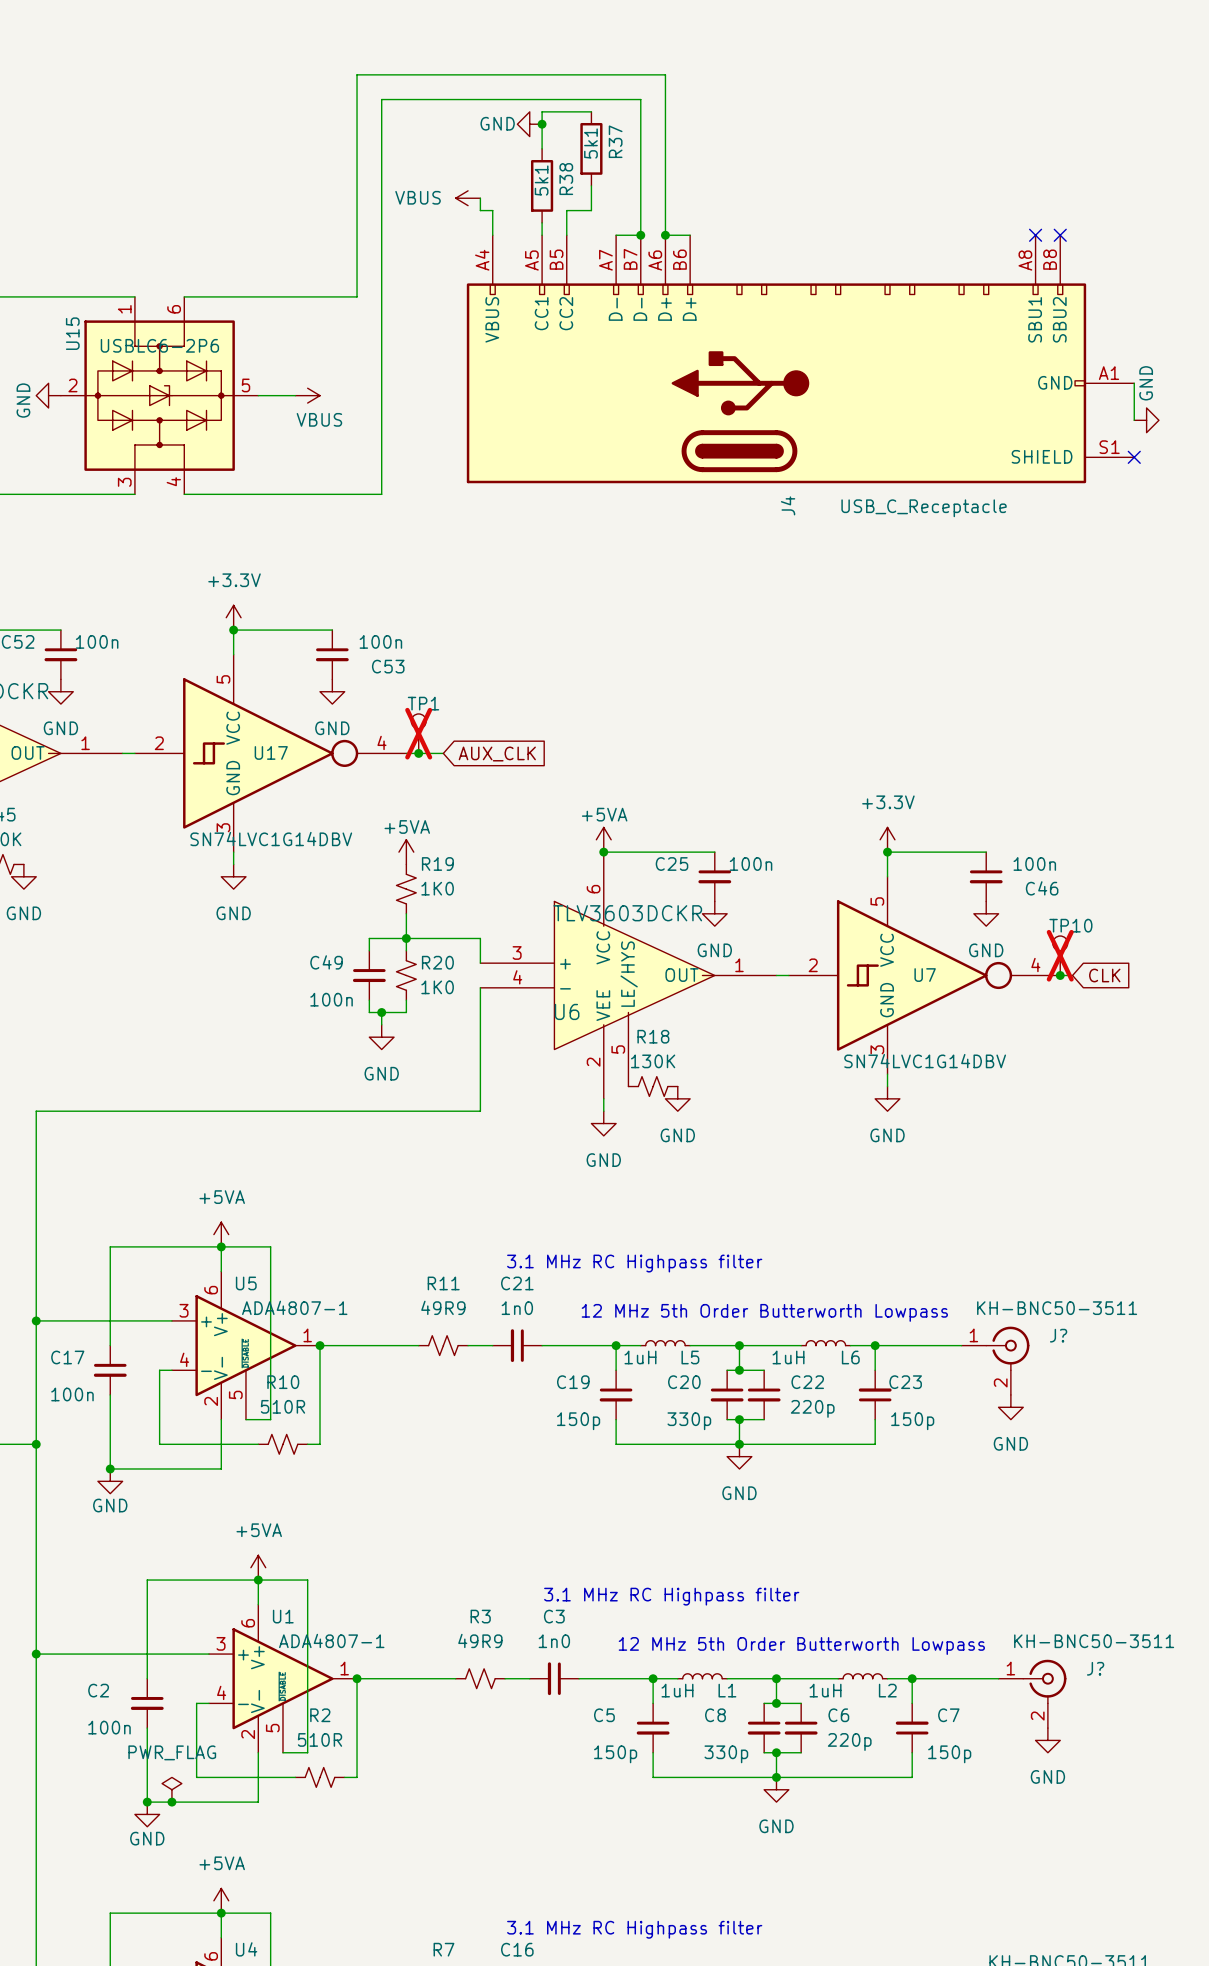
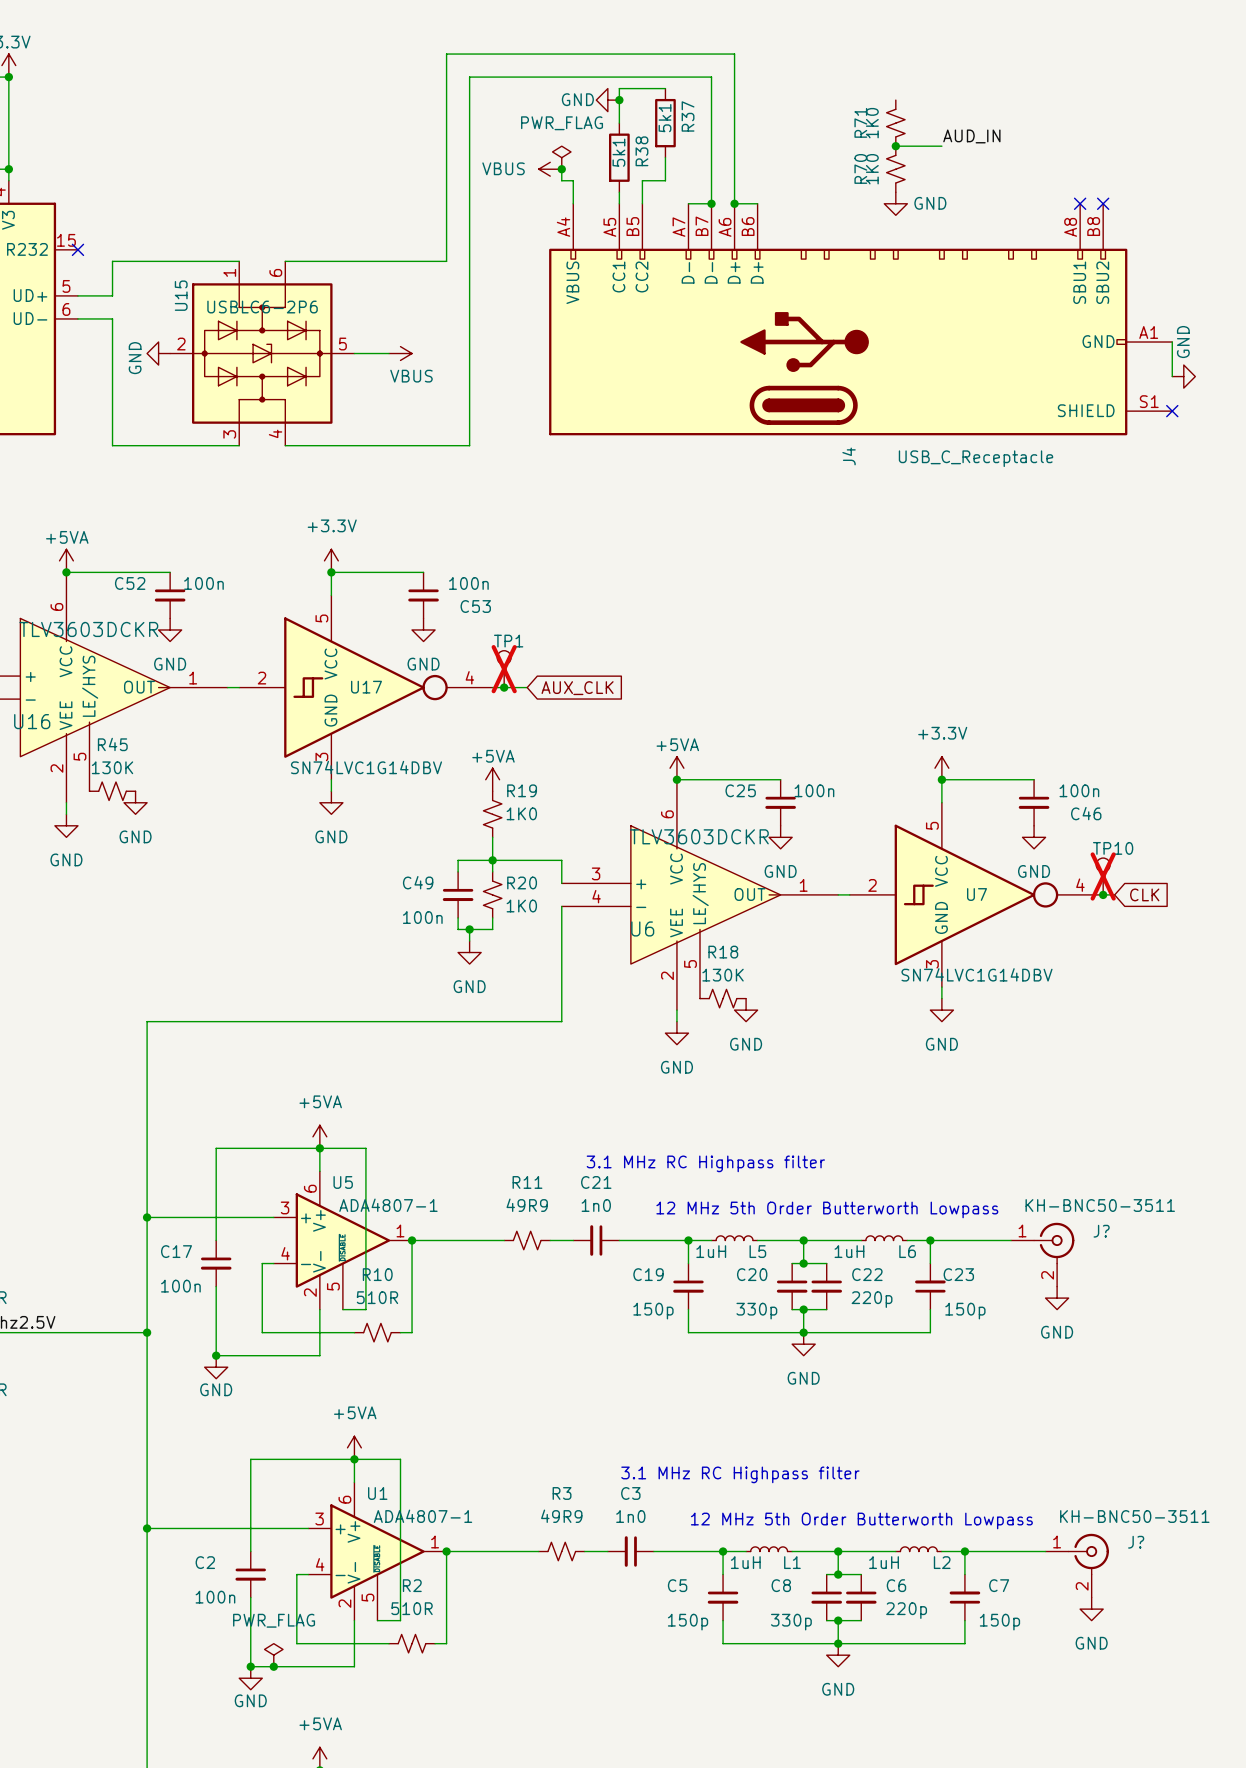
R71: none -> 1K0 (895, 123)
label: none -> AUD_IN (971, 136)
wire: none -> (895, 146) (941, 146)
junction: none -> (895, 146)
power symbol: none -> PWR_FLAG (561, 157)
junction: none -> (561, 169)
R70: none -> 1K0 (895, 169)
power symbol: none -> GND (895, 203)

